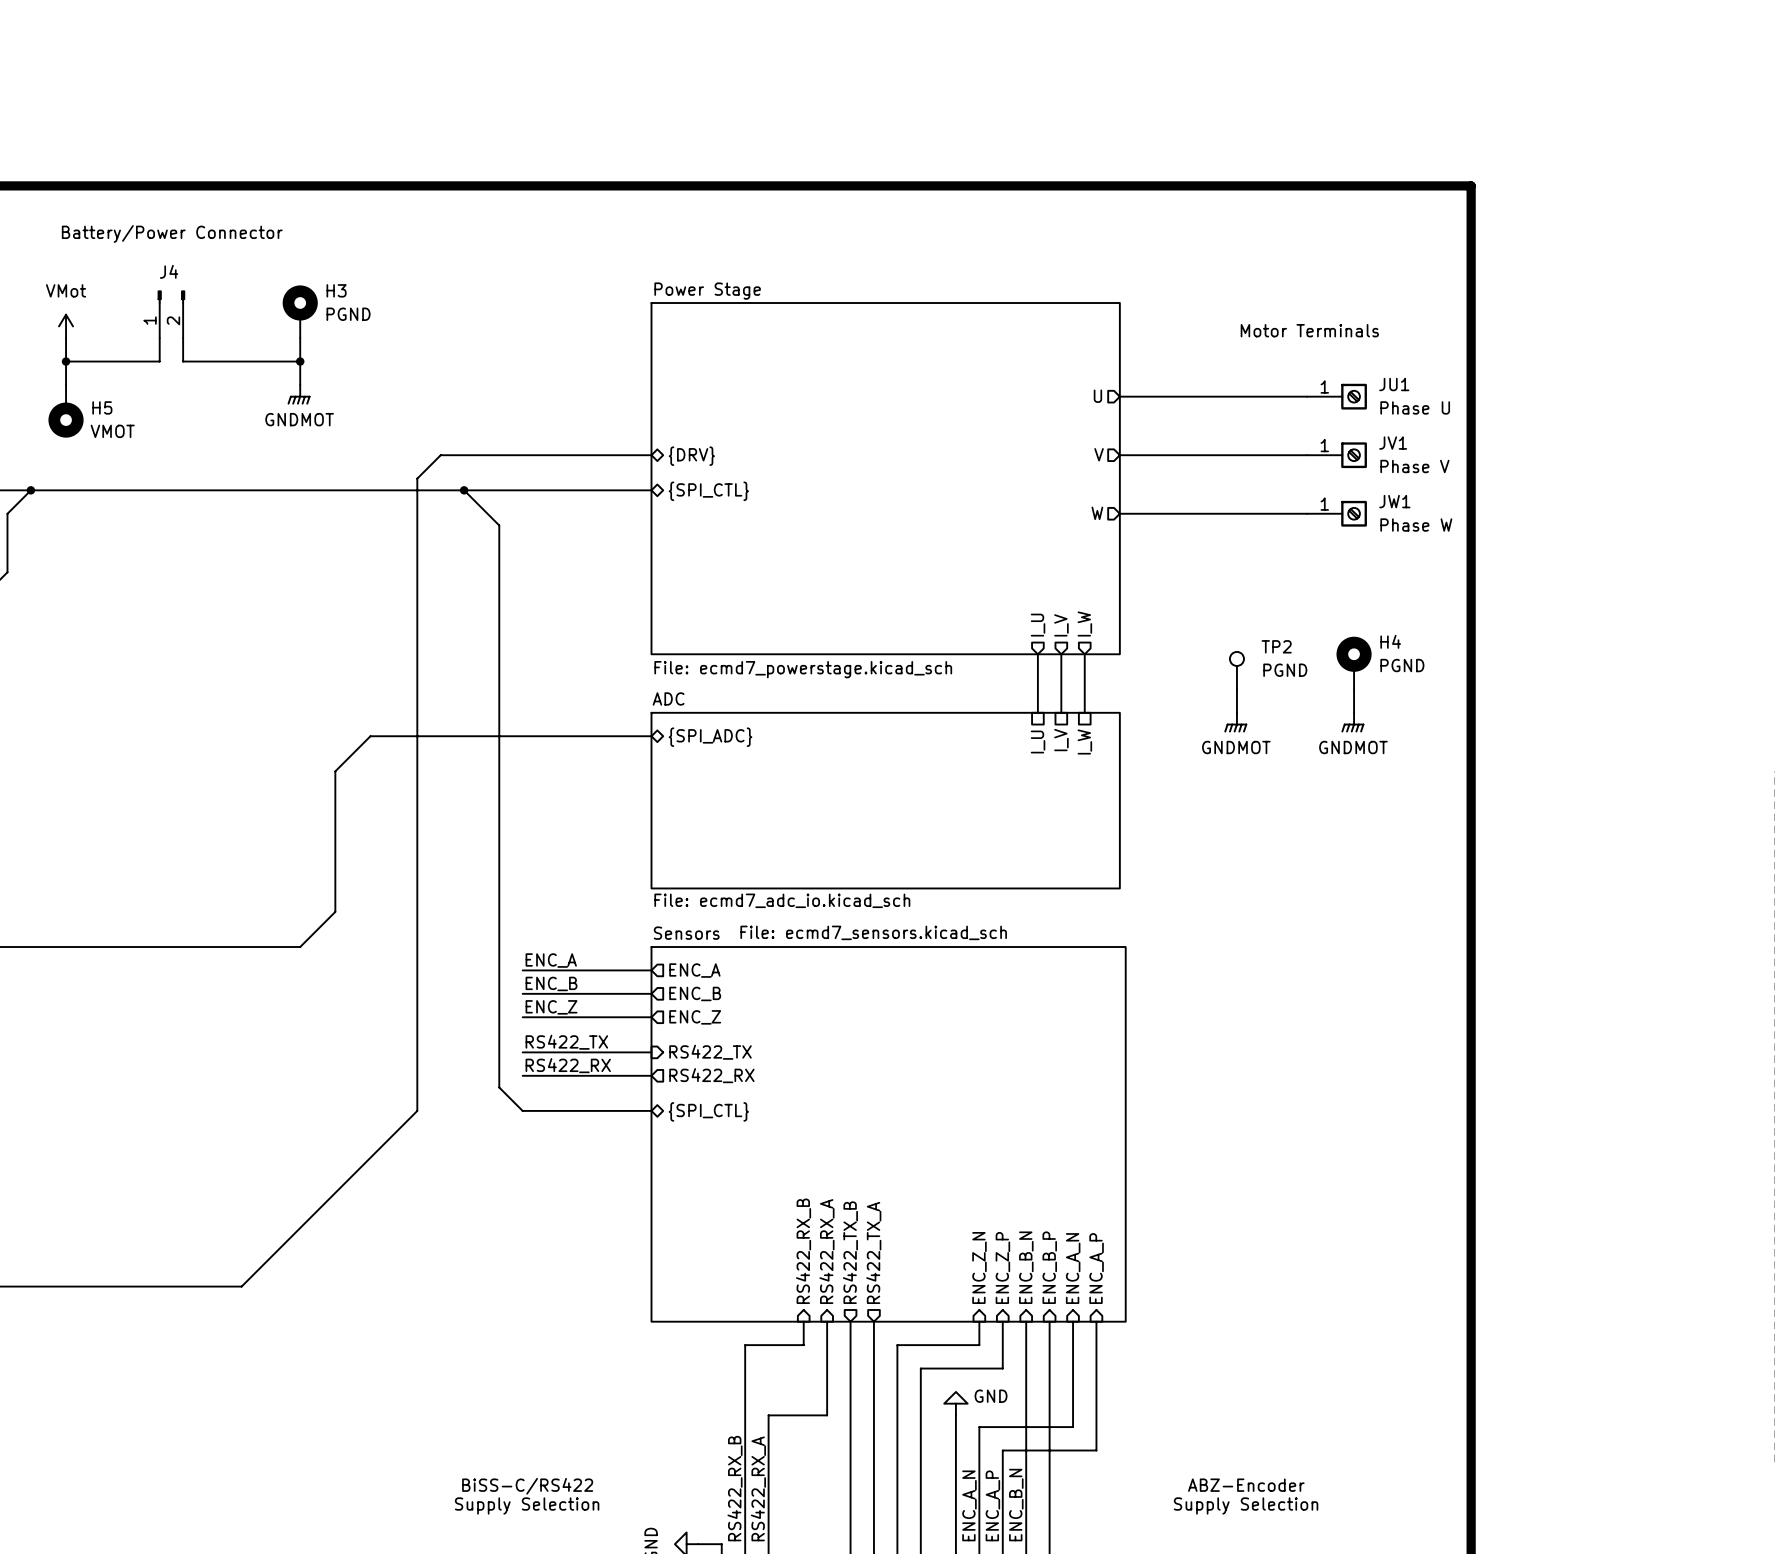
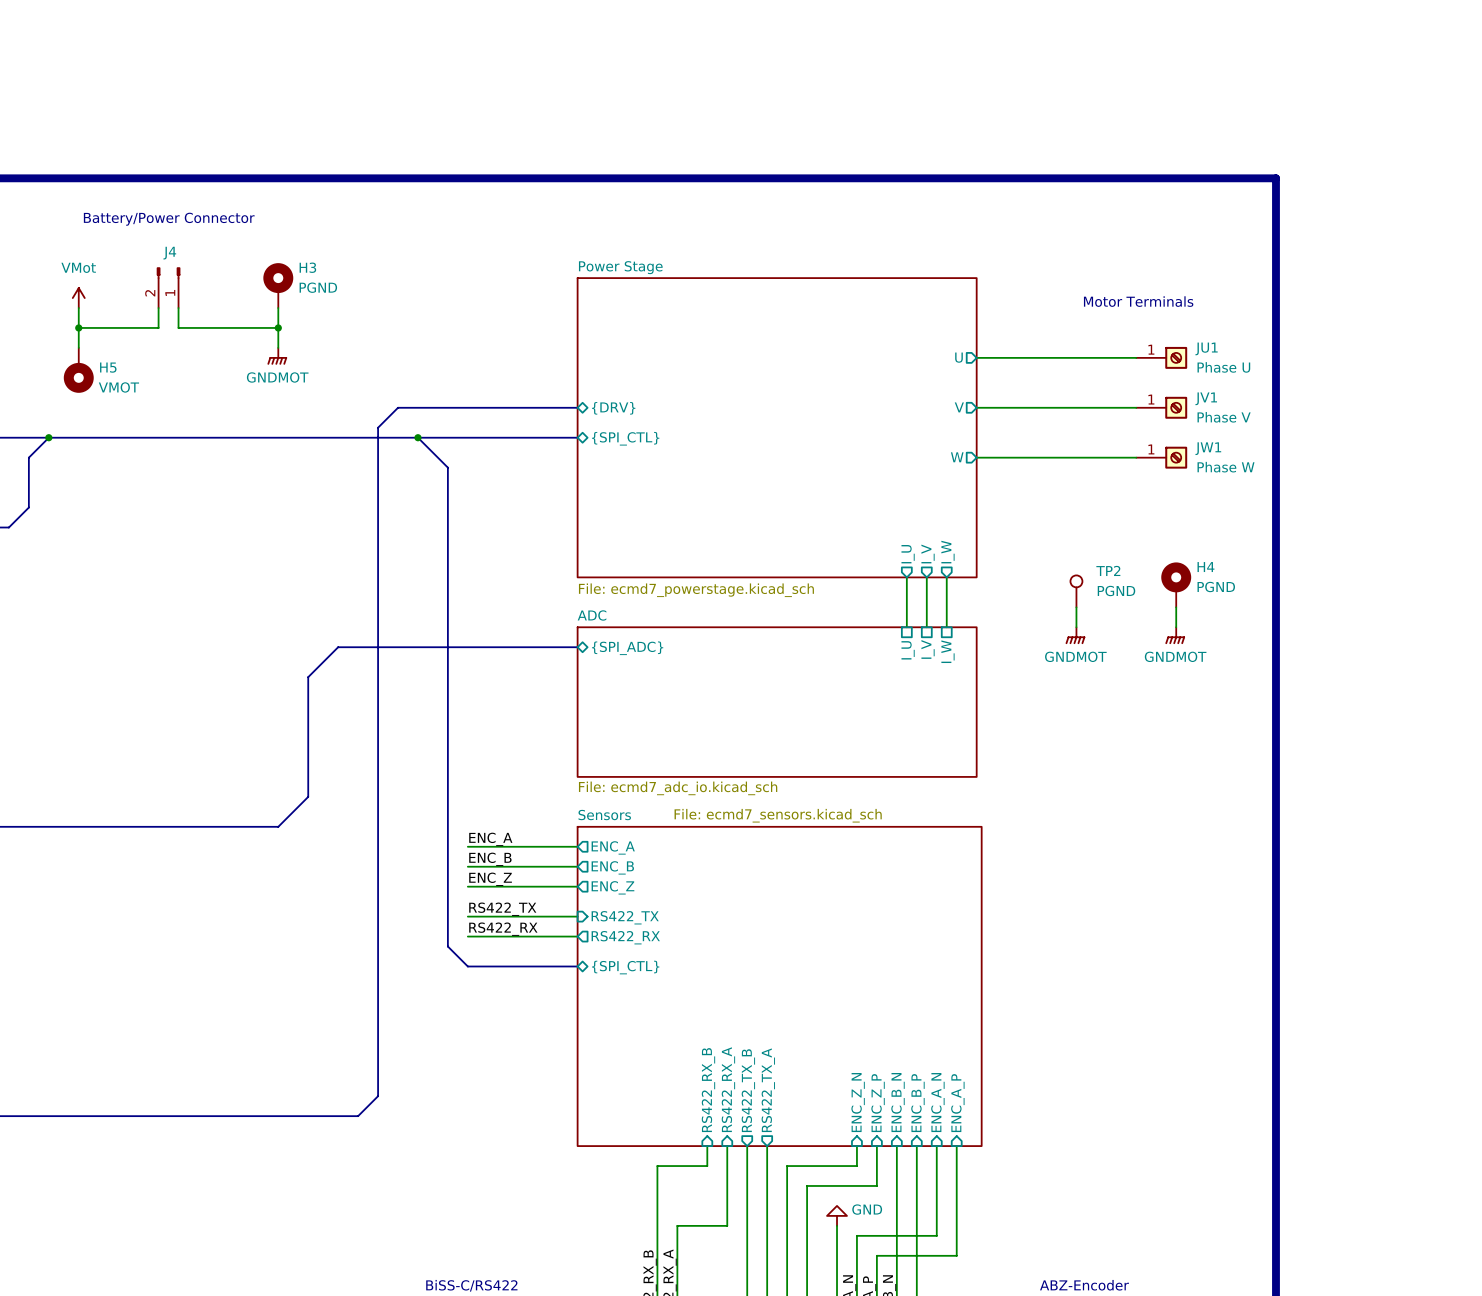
J4 flip: as is (171, 297) -> left-right (168, 273)
bus: (417, 1110) (241, 1286) -> (378, 966) (378, 1096) (358, 1116) (228, 1116)

